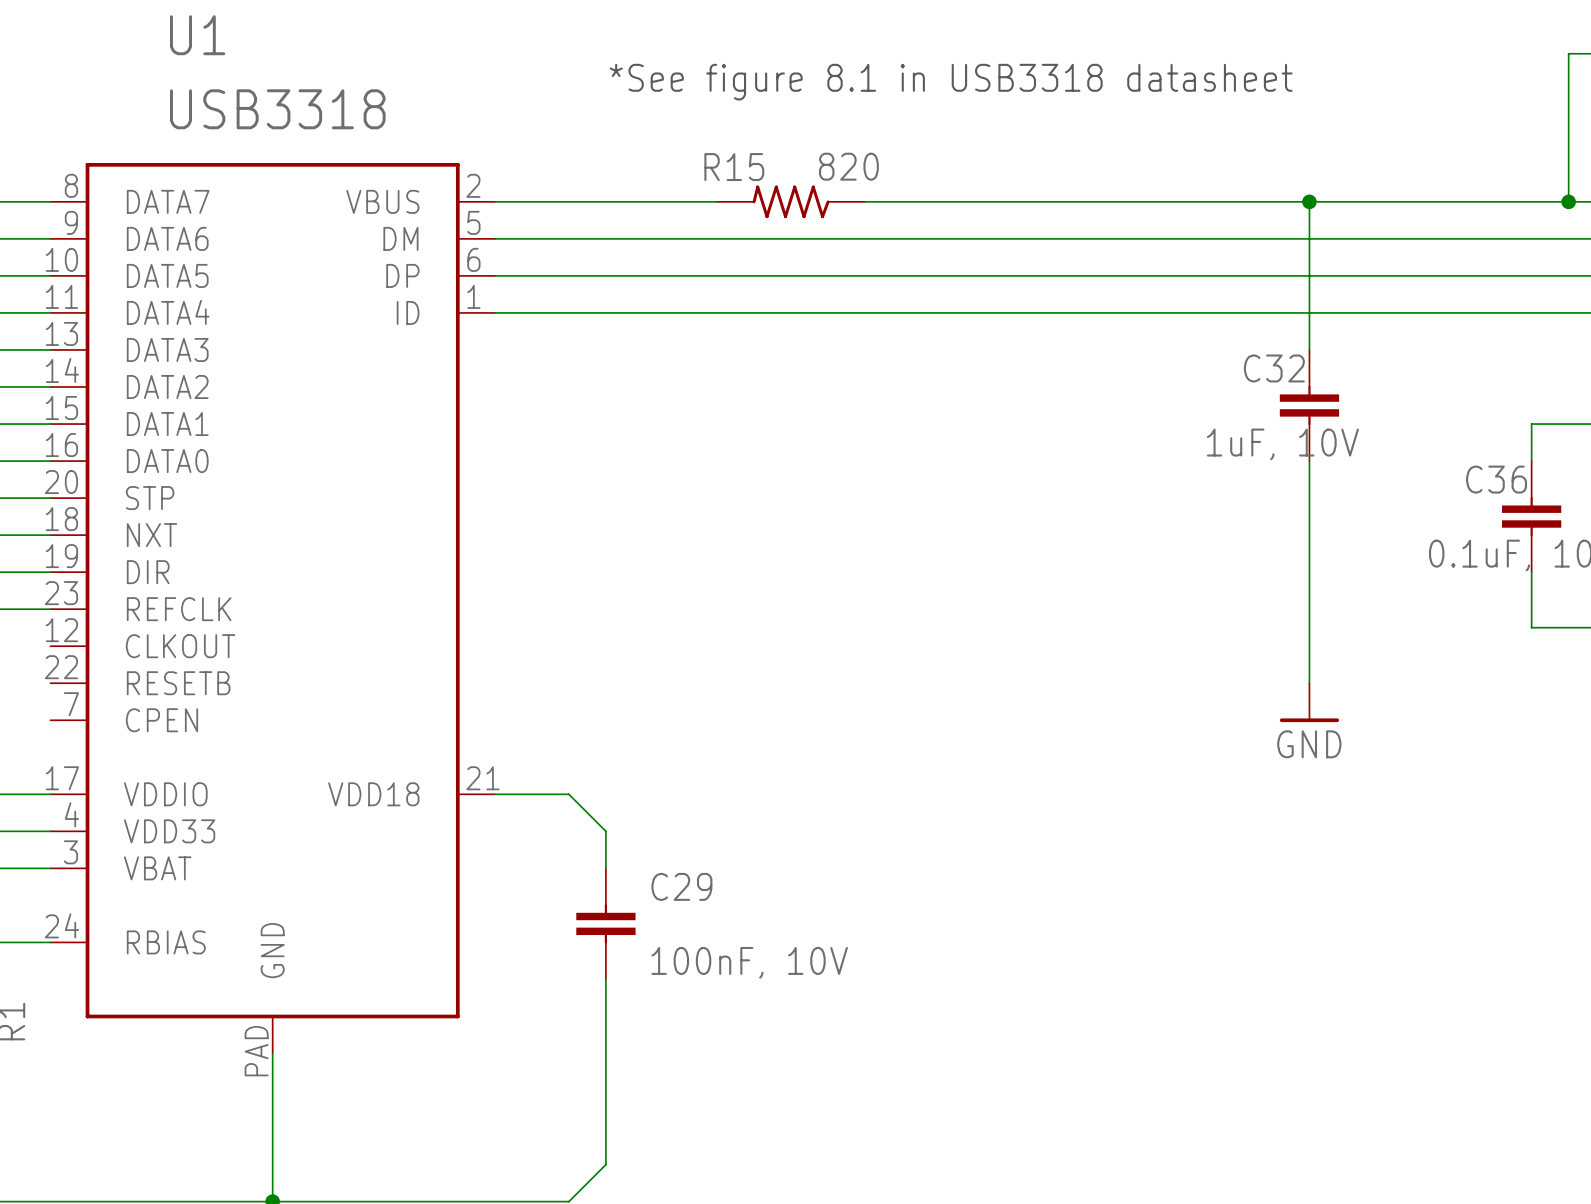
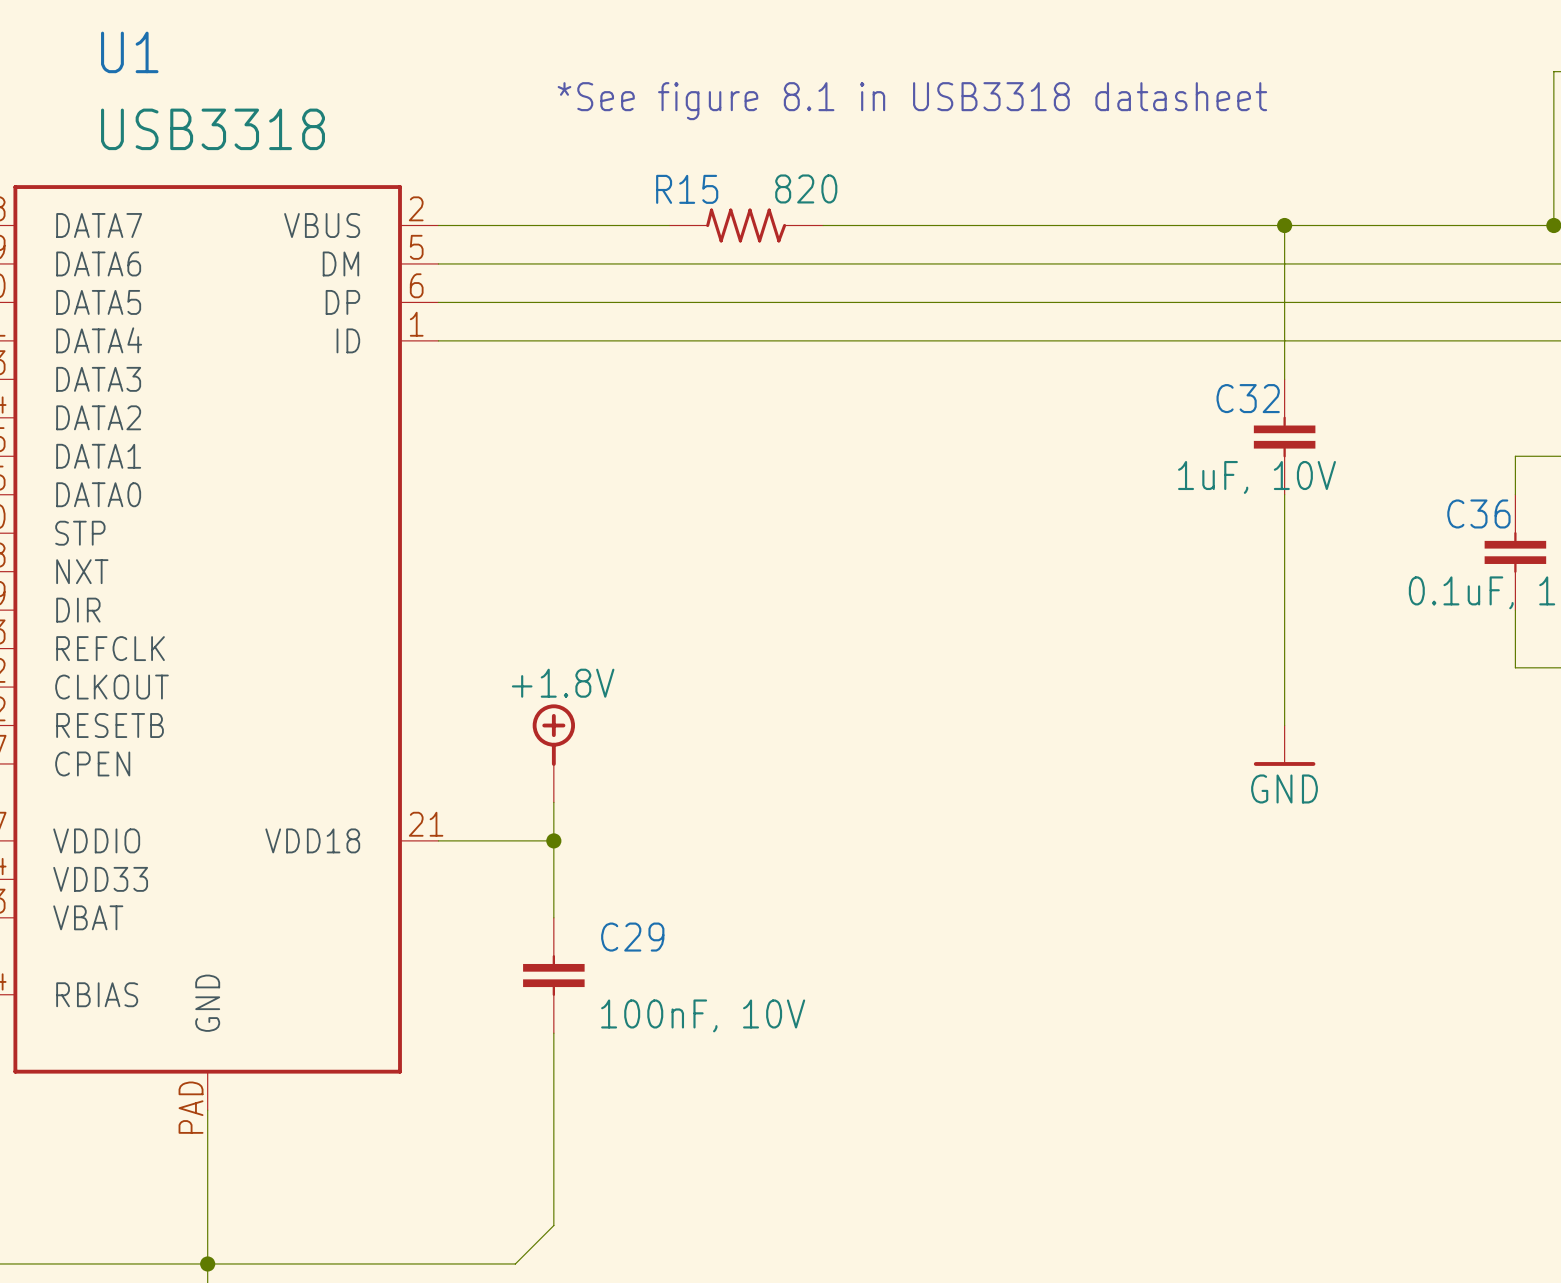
power symbol: none -> +1.8V (553, 753)
wire: none -> (553, 802) (553, 879)
wire: (568, 794) (605, 831) -> (515, 840) (553, 840)
junction: none -> (553, 840)

